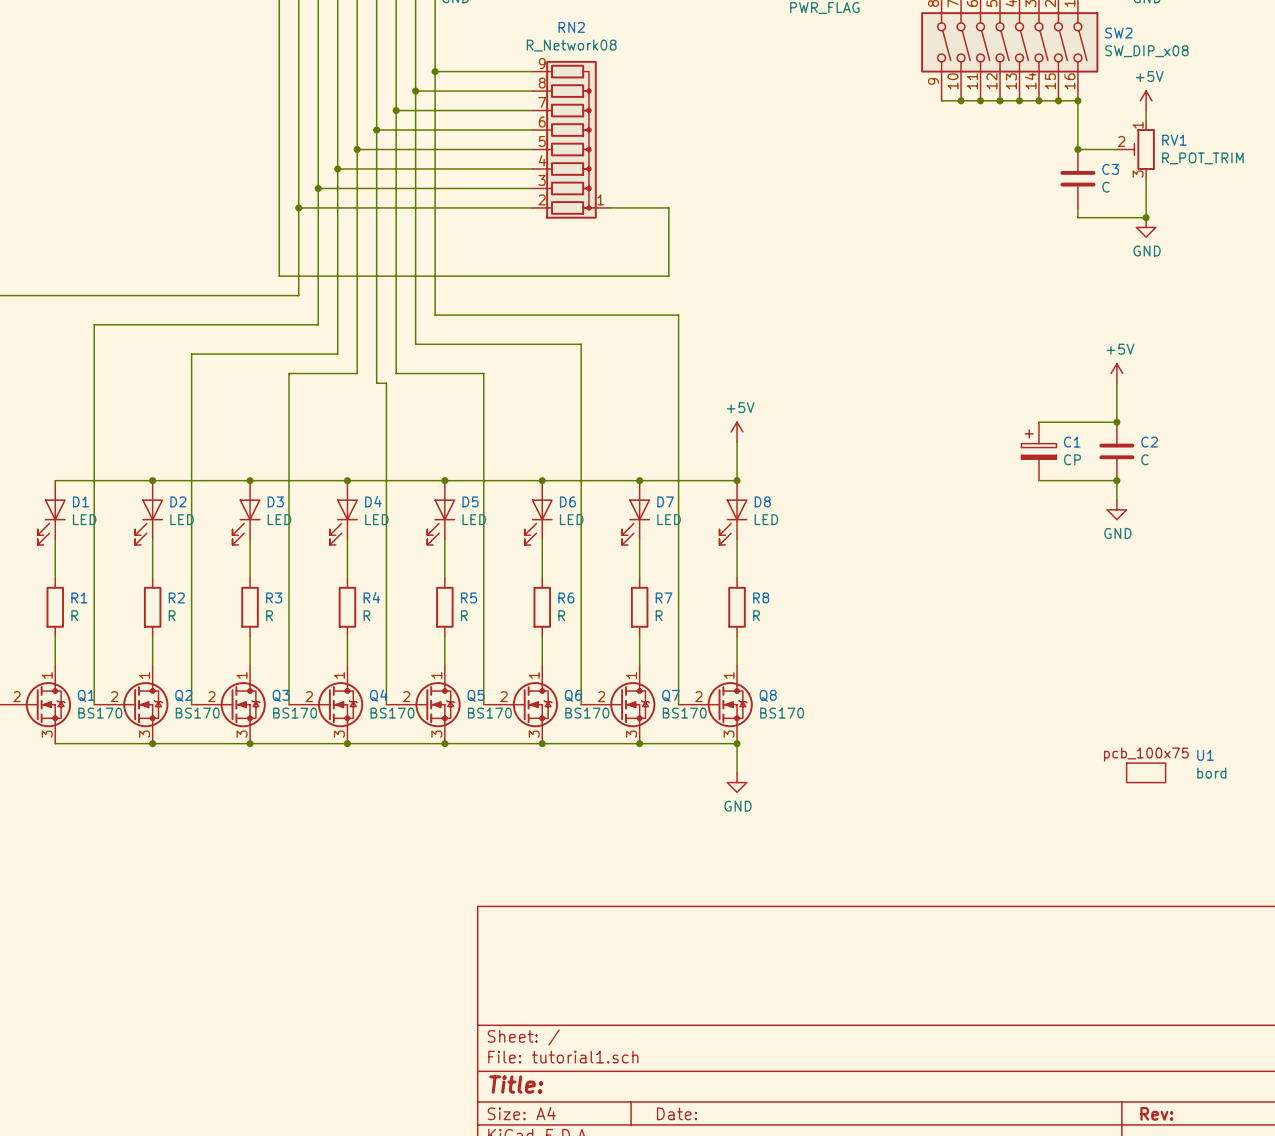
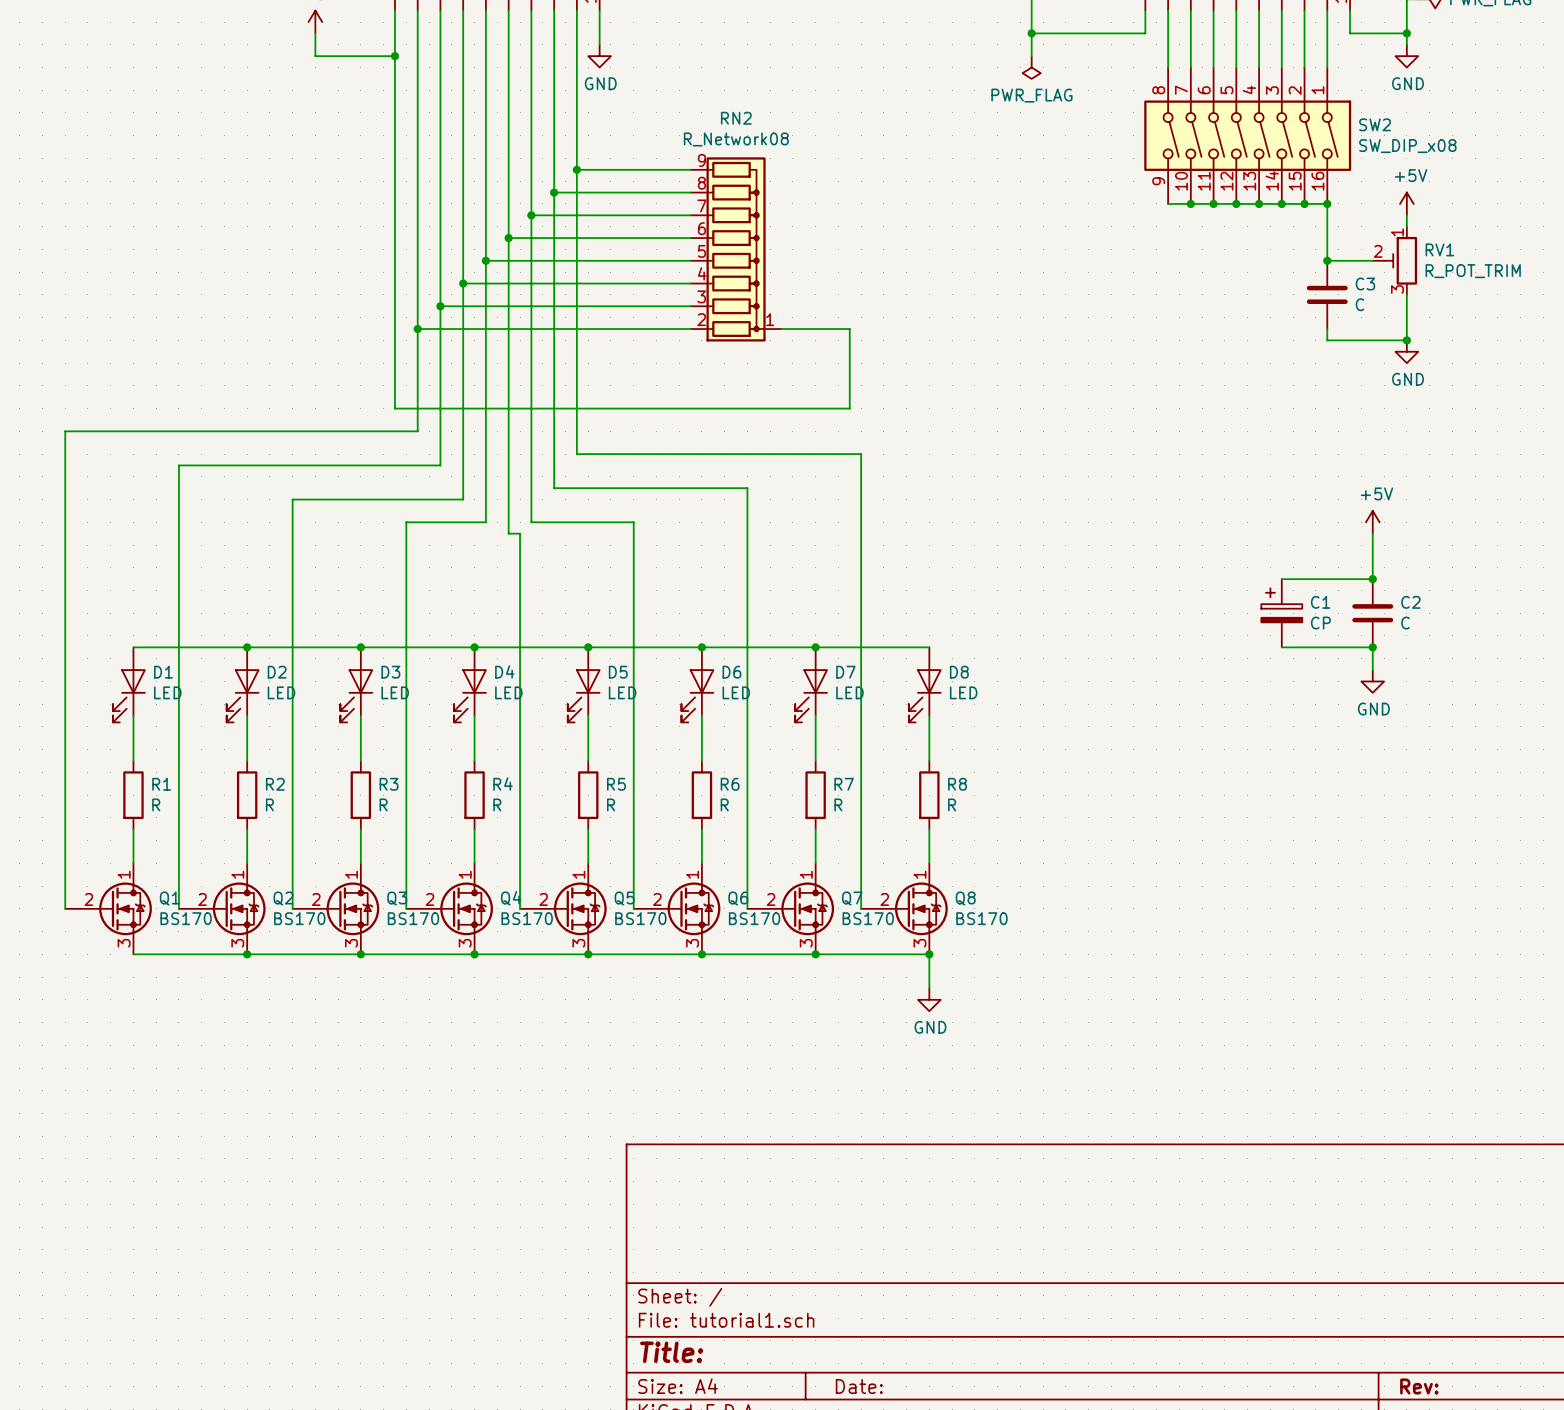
power symbol: +5V (737, 431) -> none
wire: (737, 441) (737, 480) -> none
junction: (737, 480) -> none
U1: bord (1146, 772) -> none

